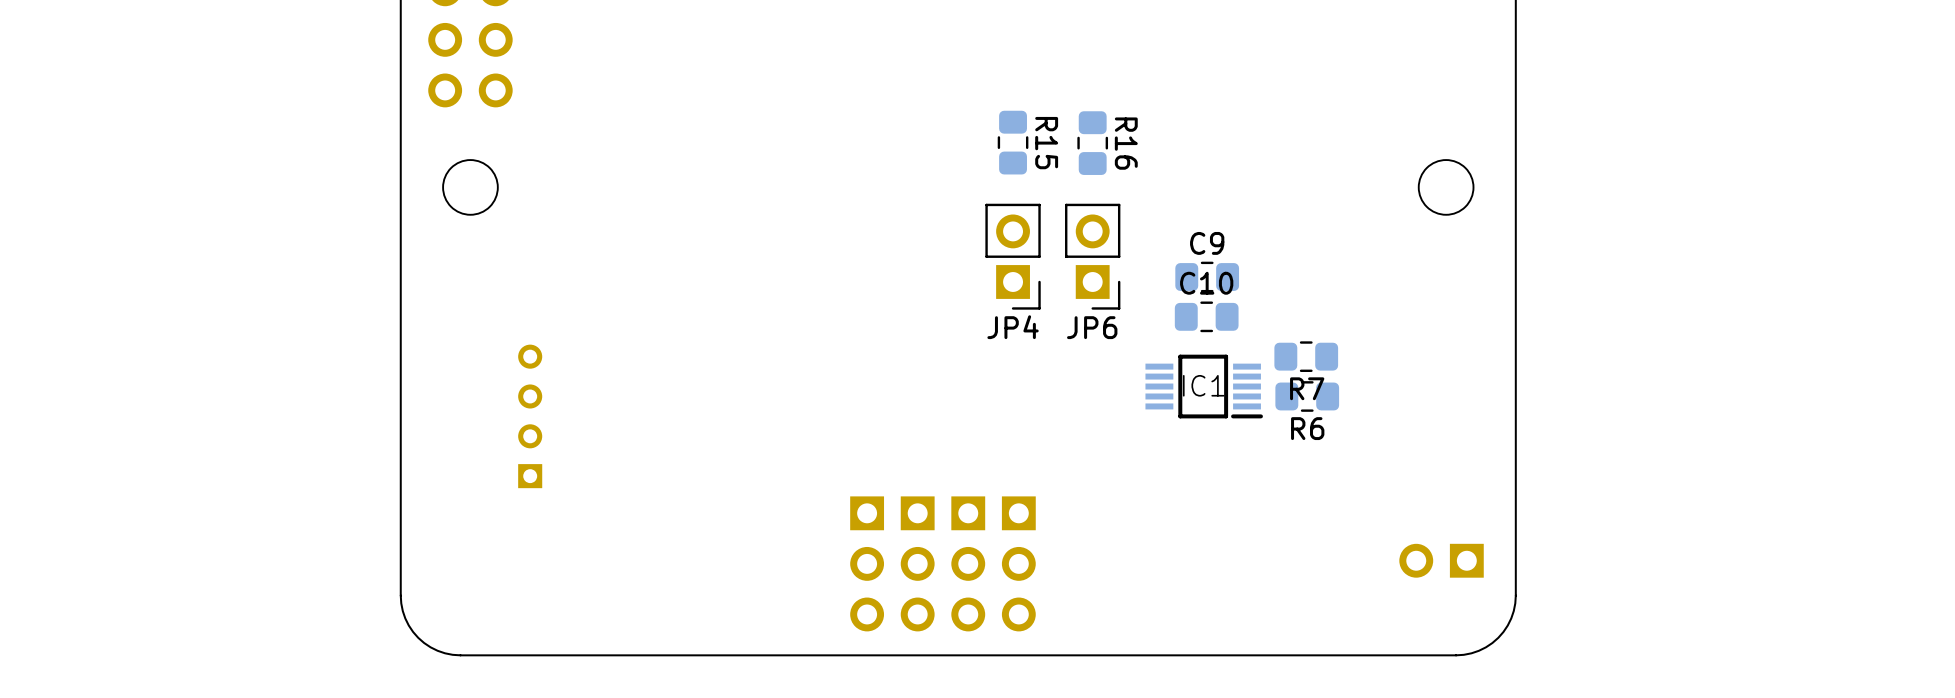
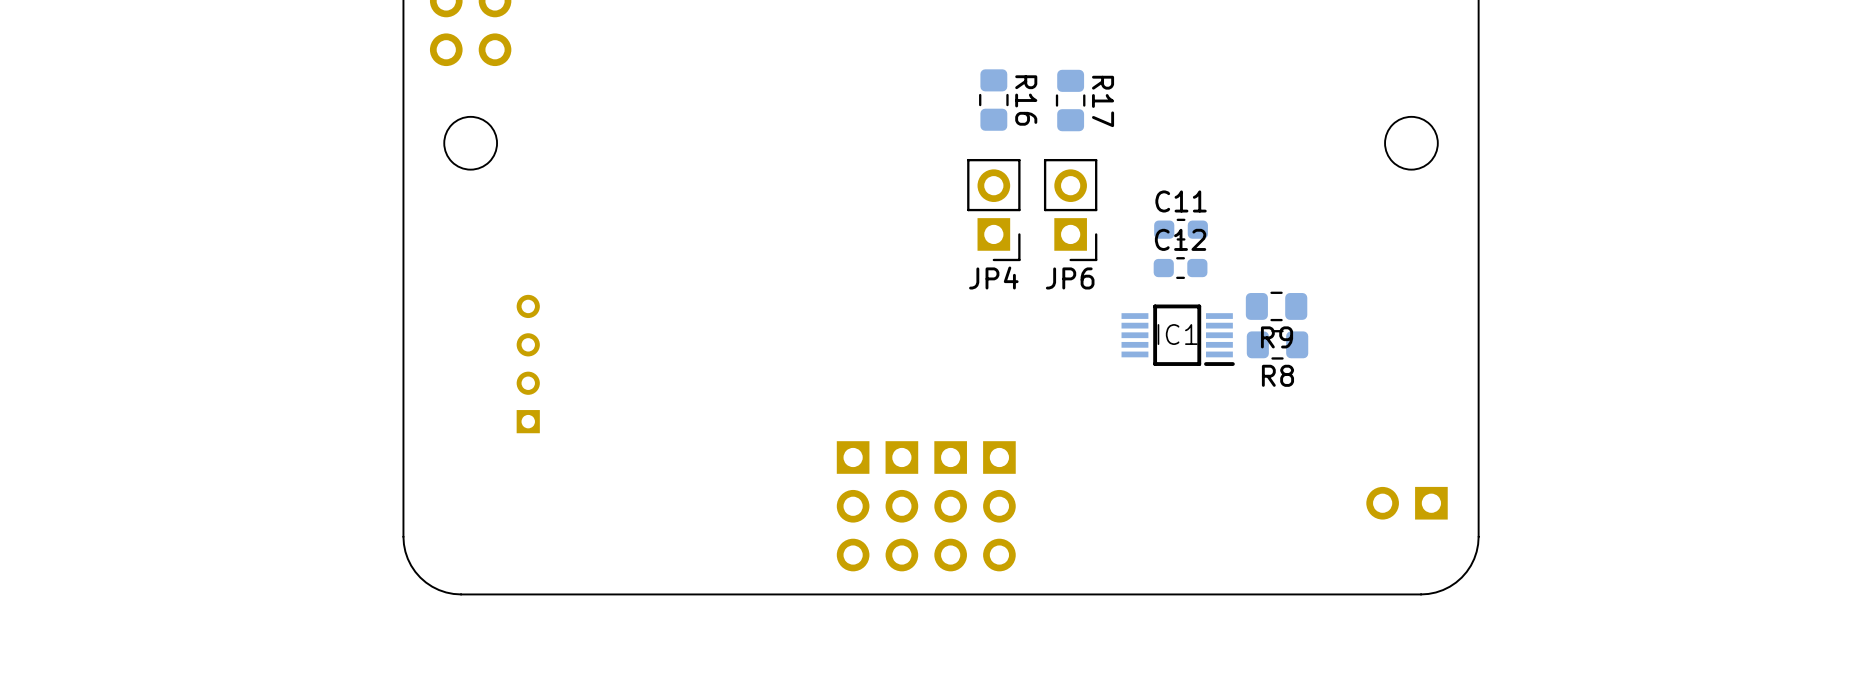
R15 name: R15 (1046, 143) -> R16 (1026, 100)
R16 name: R16 (1126, 143) -> R17 (1103, 101)
C9: (1207, 277) -> none
C11: none -> (1181, 229)
C10: (1206, 316) -> none
C12: none -> (1180, 268)
R7 name: R7 (1307, 388) -> R9 (1277, 337)
R6 name: R6 (1307, 428) -> R8 (1277, 375)

